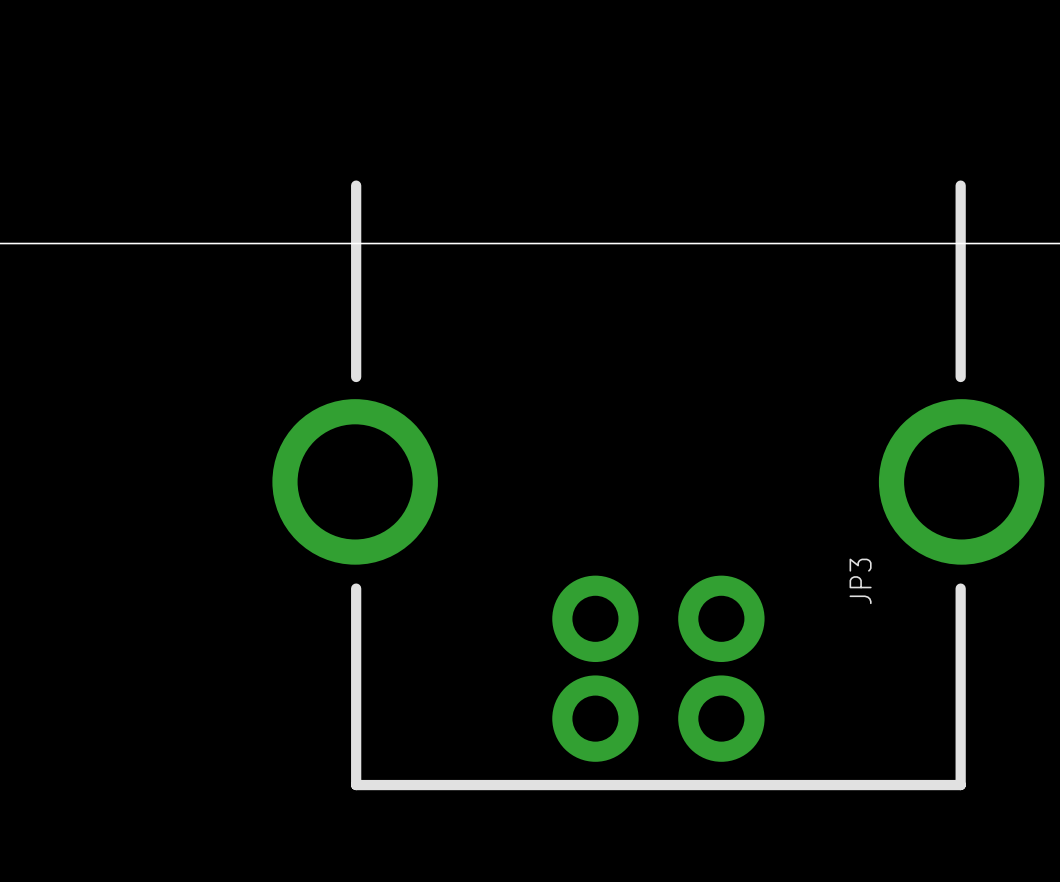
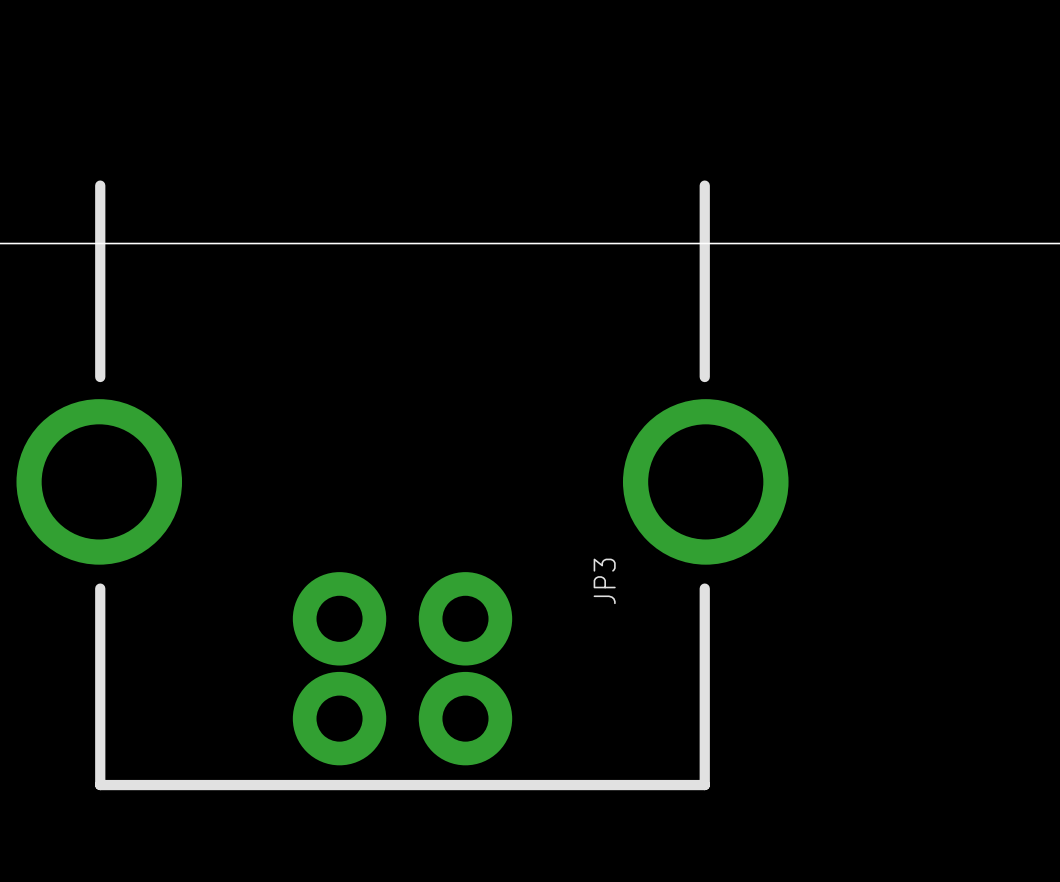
JP3 footprint: [272, 180, 1045, 791] -> [16, 180, 789, 791]

